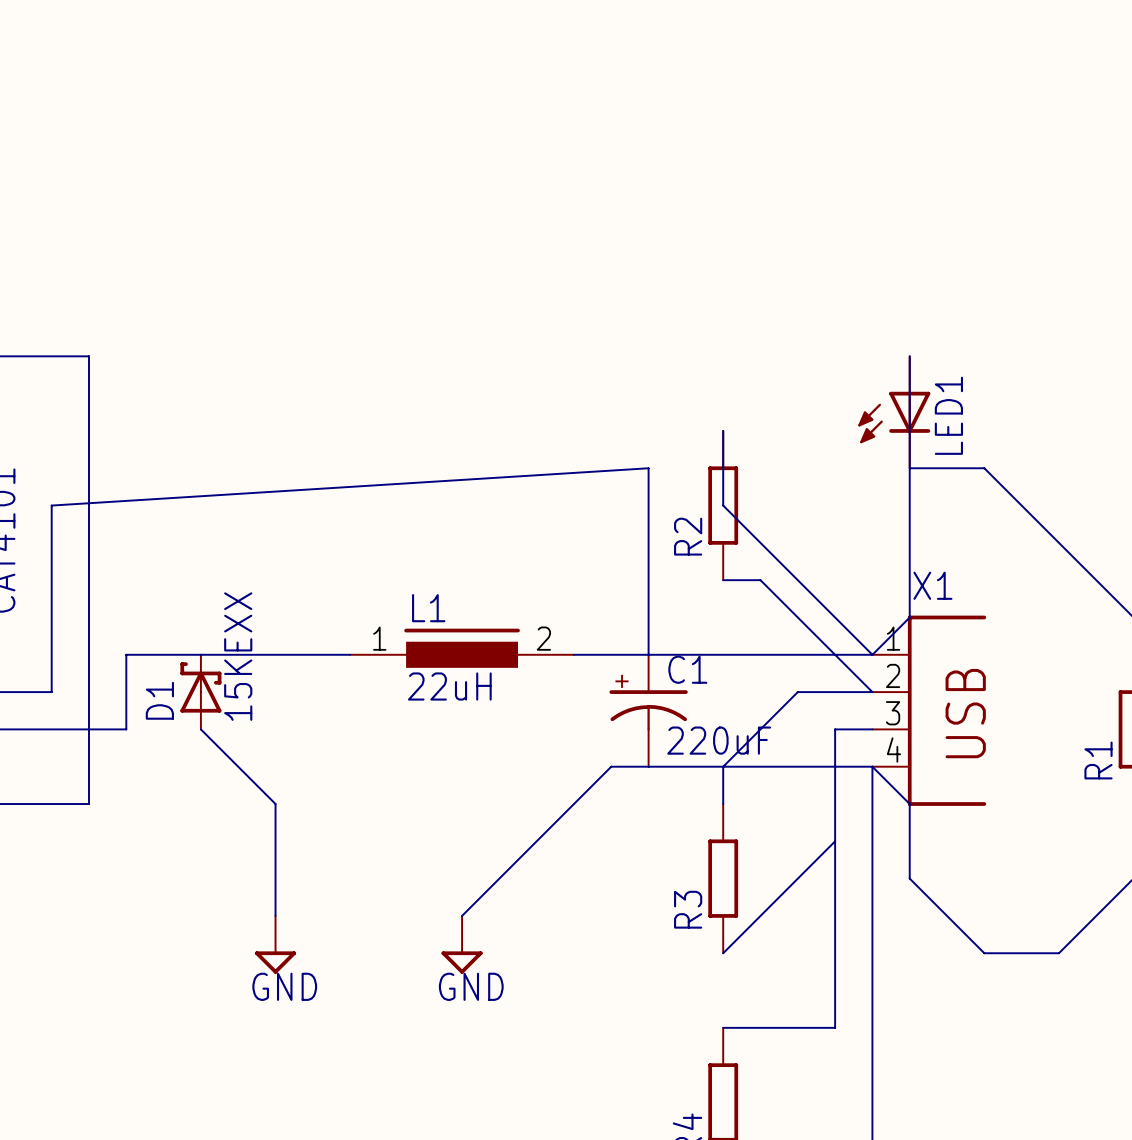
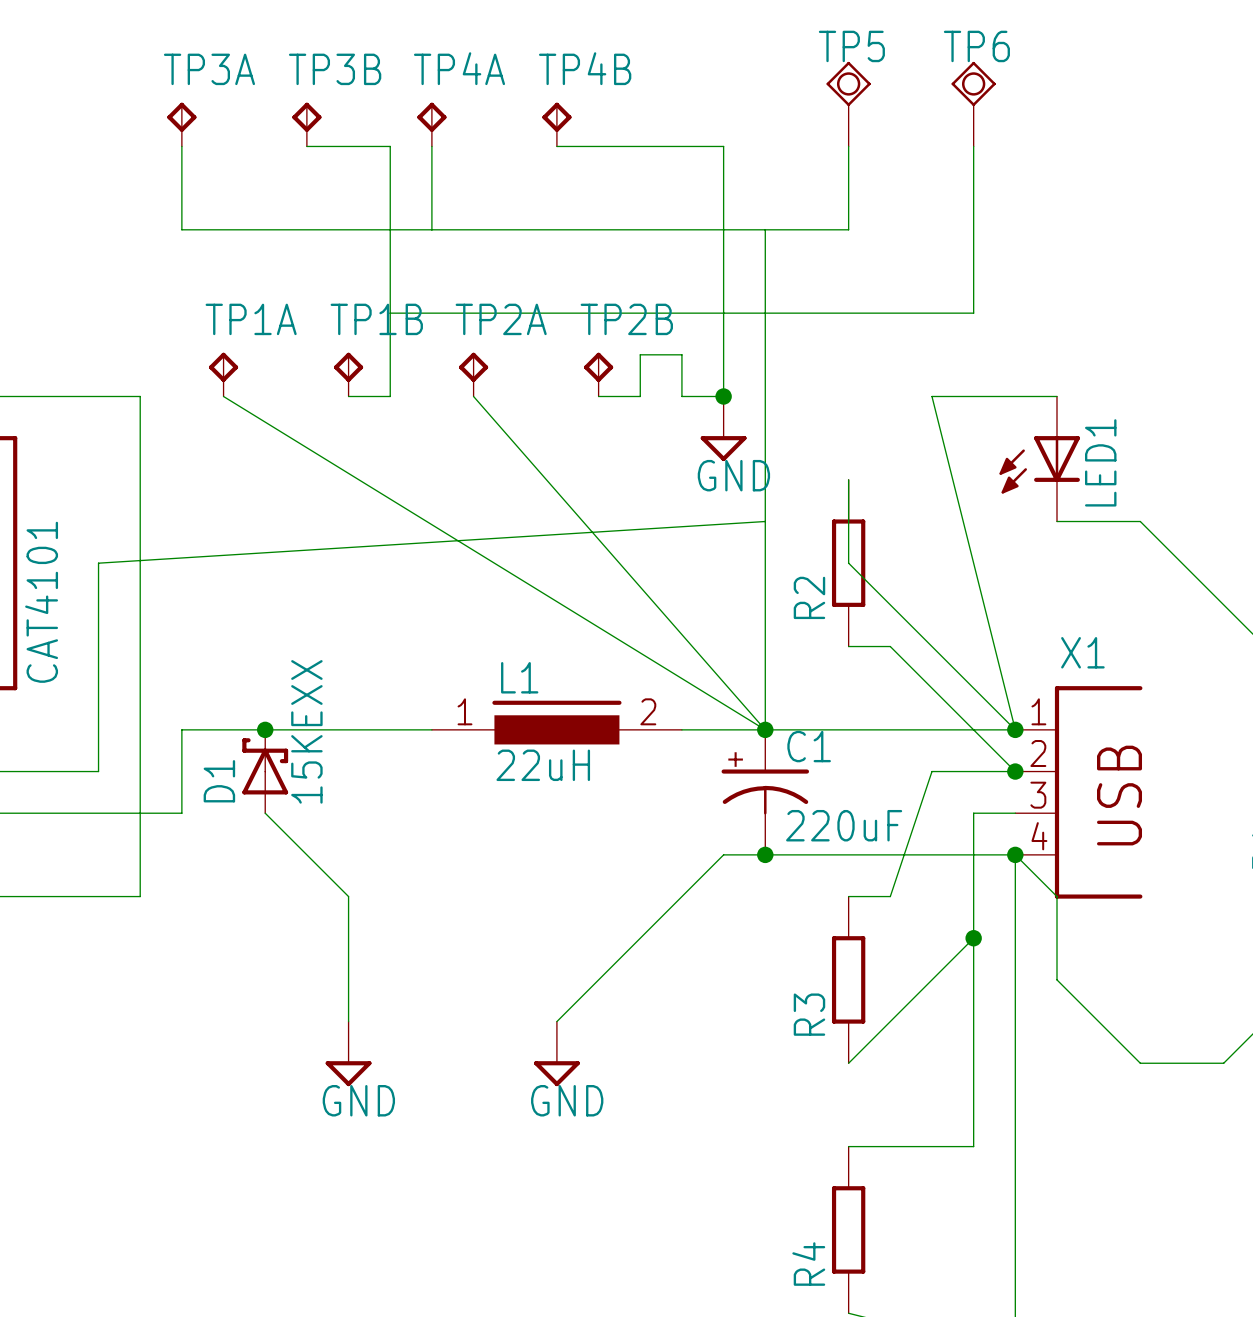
TP5: none -> (848, 104)
TP6: none -> (973, 104)
TP3A: none -> (181, 124)
TP3B: none -> (306, 124)
TP4A: none -> (431, 124)
TP4B: none -> (556, 124)
wire: none -> (181, 146) (181, 229) (848, 229) (848, 146)
wire: none -> (306, 146) (390, 146) (390, 396) (348, 396)
wire: none -> (431, 146) (431, 229)
wire: none -> (556, 146) (723, 146) (723, 396) (681, 396) (681, 354) (640, 354) (640, 396) (598, 396)
wire: none -> (973, 146) (973, 313) (390, 313)
wire: none -> (765, 229) (765, 521)
TP1A: none -> (223, 374)
TP1B: none -> (348, 374)
TP2A: none -> (473, 374)
TP2B: none -> (598, 374)
wire: none -> (223, 396) (765, 729) (473, 396)
junction: none -> (723, 396)
wire: (909, 356) (909, 617) (872, 654) -> (1057, 396) (931, 396) (1015, 729)
power symbol: none -> GND (723, 428)
junction: none -> (265, 729)
junction: none -> (765, 729)
junction: none -> (1015, 729)
wire: (797, 692) (723, 766) (723, 804) -> (931, 771) (890, 896) (848, 896)
junction: none -> (1015, 771)
junction: none -> (765, 854)
junction: none -> (1015, 854)
junction: none -> (973, 938)

